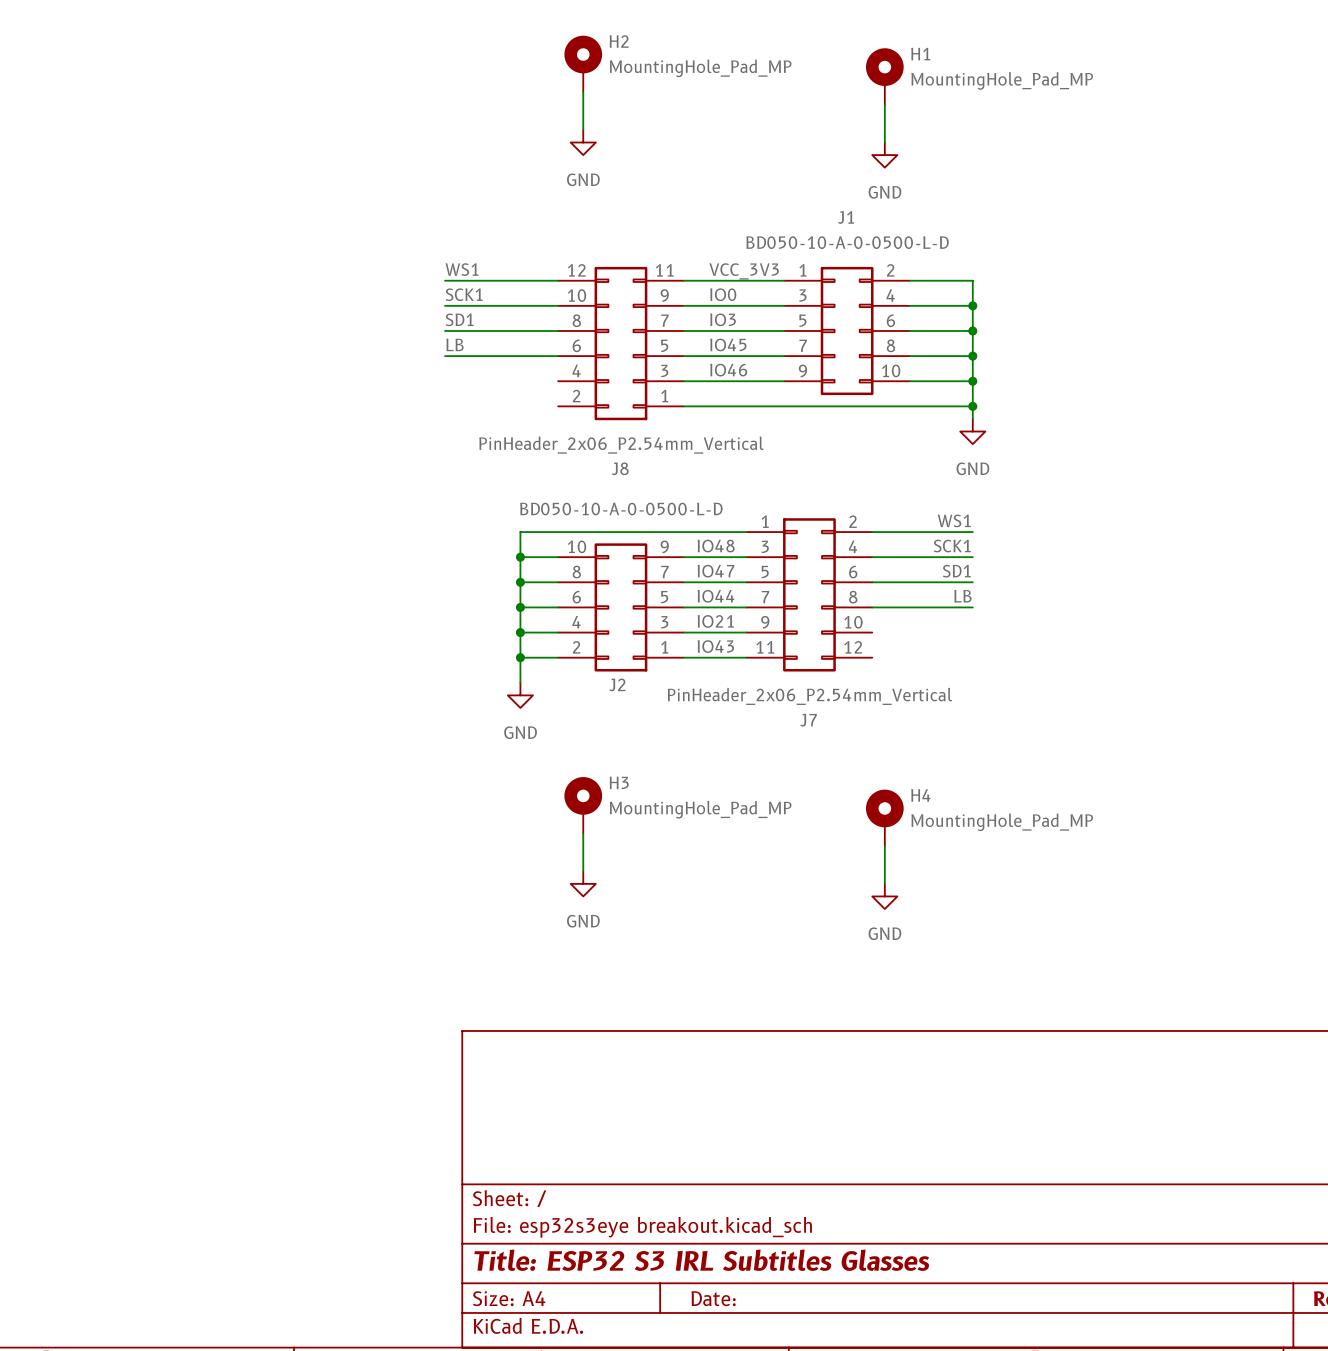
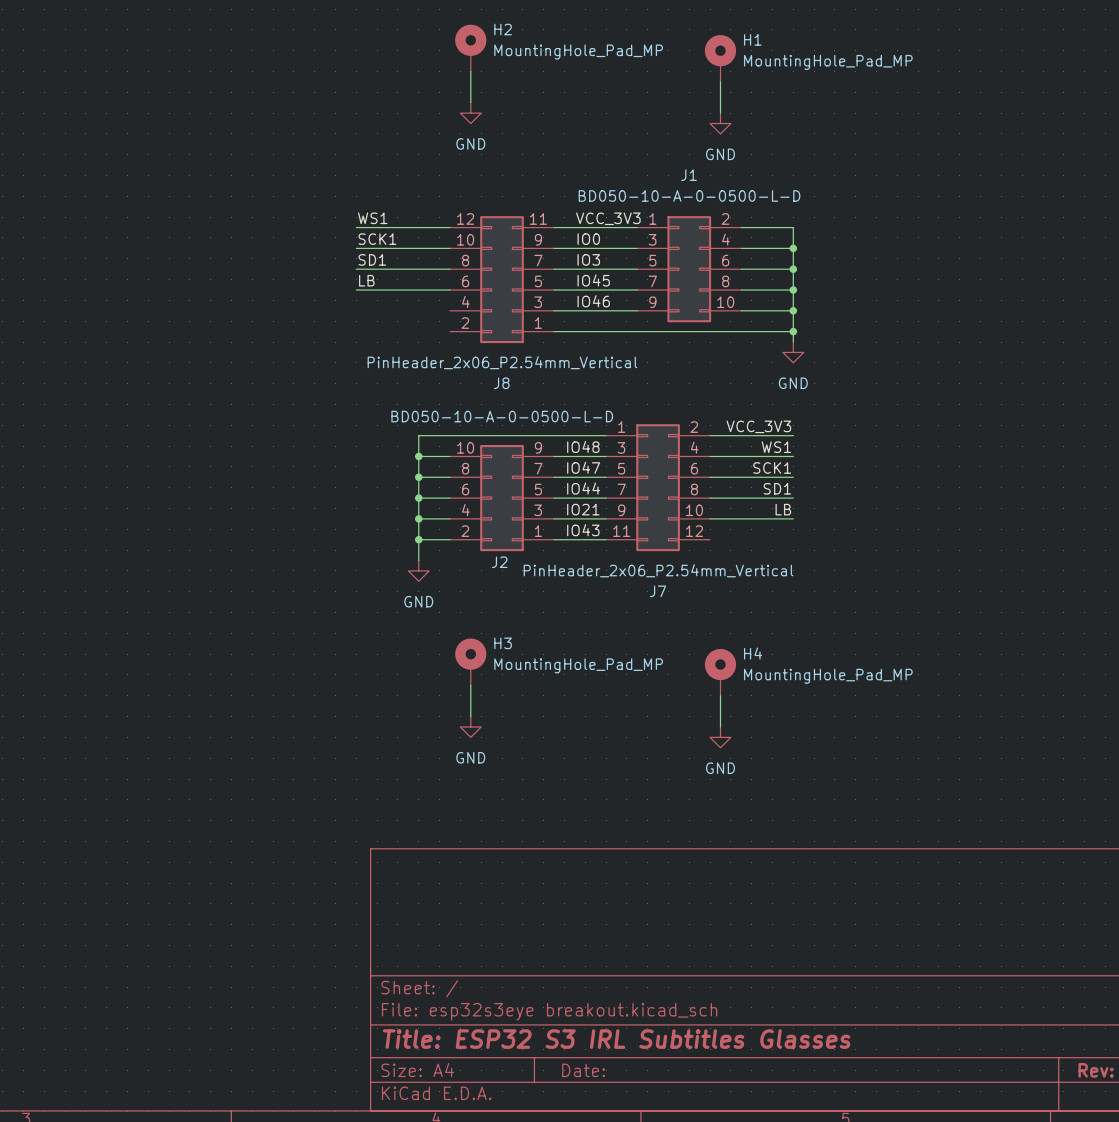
label: WS1 (954, 520) -> VCC_3V3 (758, 426)
label: SCK1 (952, 546) -> WS1 (776, 447)
label: SD1 (956, 571) -> SCK1 (772, 467)
label: LB (962, 596) -> SD1 (777, 488)
label: none -> LB (783, 509)
wire: none -> (710, 518) (793, 518)

